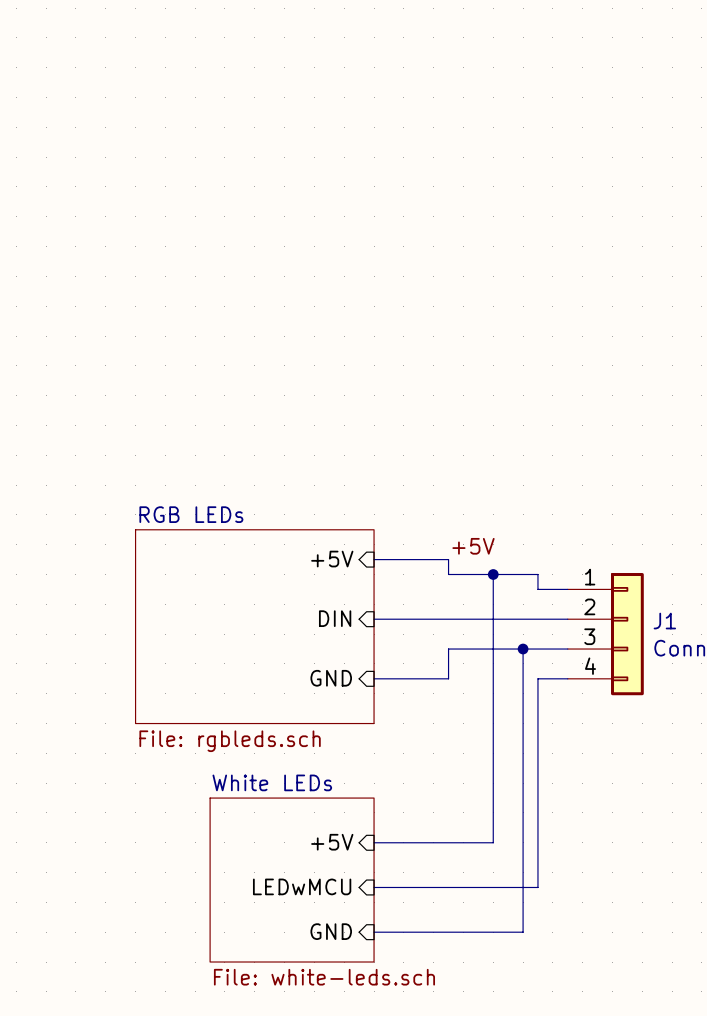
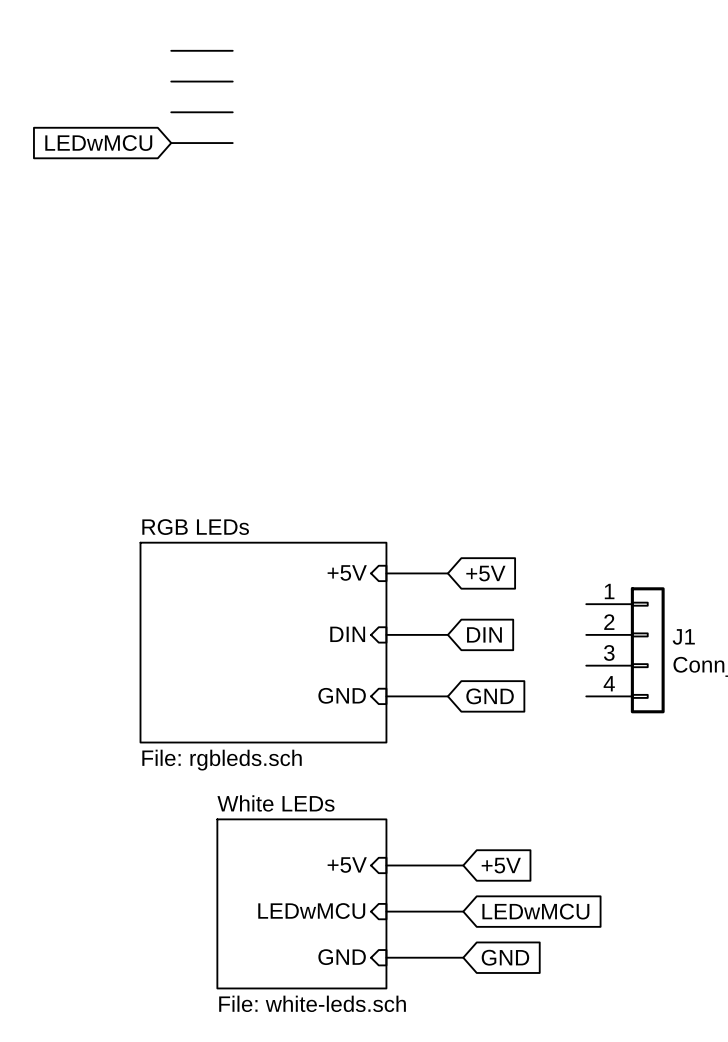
wire: none -> (171, 50) (232, 50)
wire: none -> (171, 81) (232, 81)
wire: none -> (171, 112) (232, 112)
global label: none -> LEDwMCU (98, 143)
wire: none -> (171, 143) (232, 143)
label: +5V (473, 546) -> none
wire: (433, 559) (448, 559) (448, 574) (537, 574) (537, 589) (567, 589) -> none
global label: none -> +5V (485, 573)
wire: (493, 574) (493, 842) (448, 842) -> none
junction: (493, 574) -> none
wire: (433, 619) (567, 619) -> none
global label: none -> DIN (484, 634)
wire: (523, 649) (523, 932) (448, 932) -> none
junction: (523, 649) -> none
wire: (567, 649) (448, 649) (448, 678) (433, 678) -> none
global label: none -> GND (490, 696)
wire: (567, 678) (537, 678) (537, 887) (448, 887) -> none
global label: none -> +5V (501, 865)
global label: none -> LEDwMCU (535, 911)
global label: none -> GND (505, 957)

